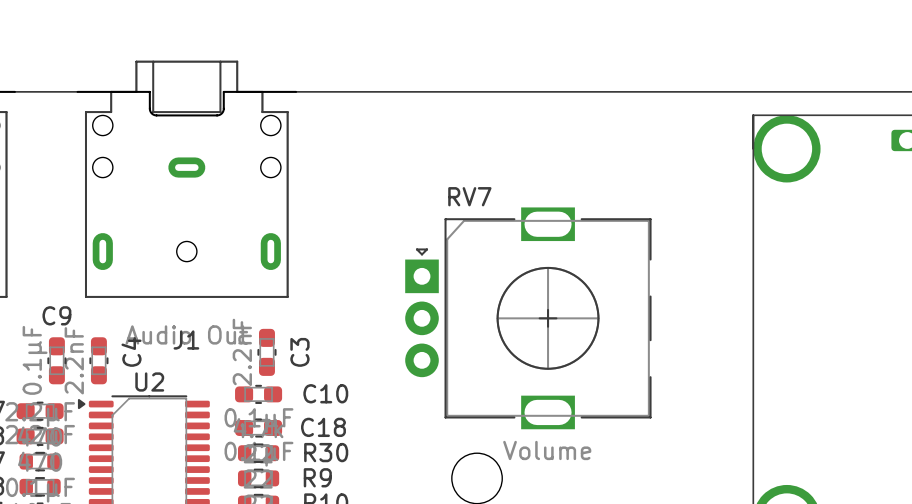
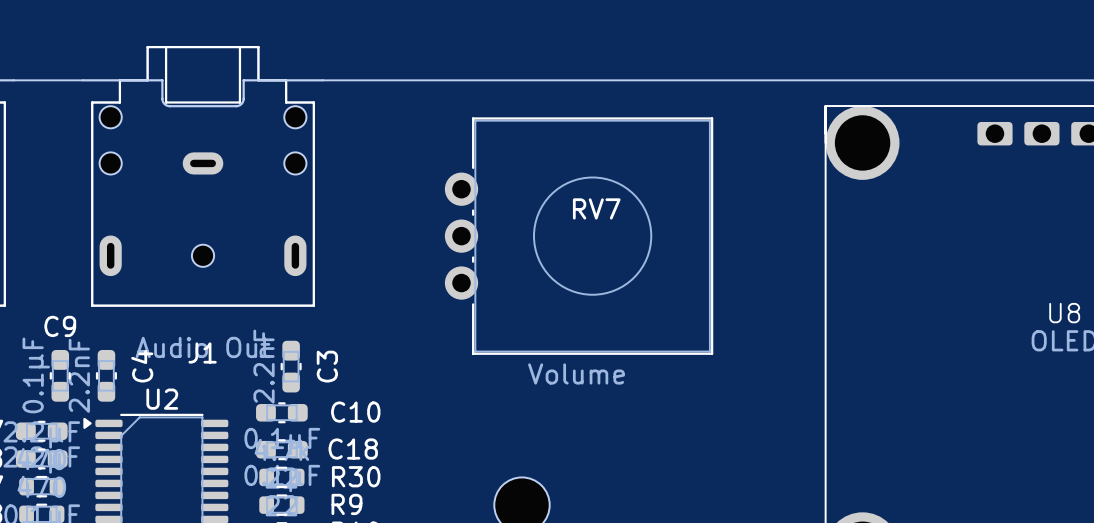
RV7 name position: RV7 (469, 196) -> RV7 (596, 208)
RV7 footprint: [405, 207, 652, 430] -> [444, 117, 714, 355]

